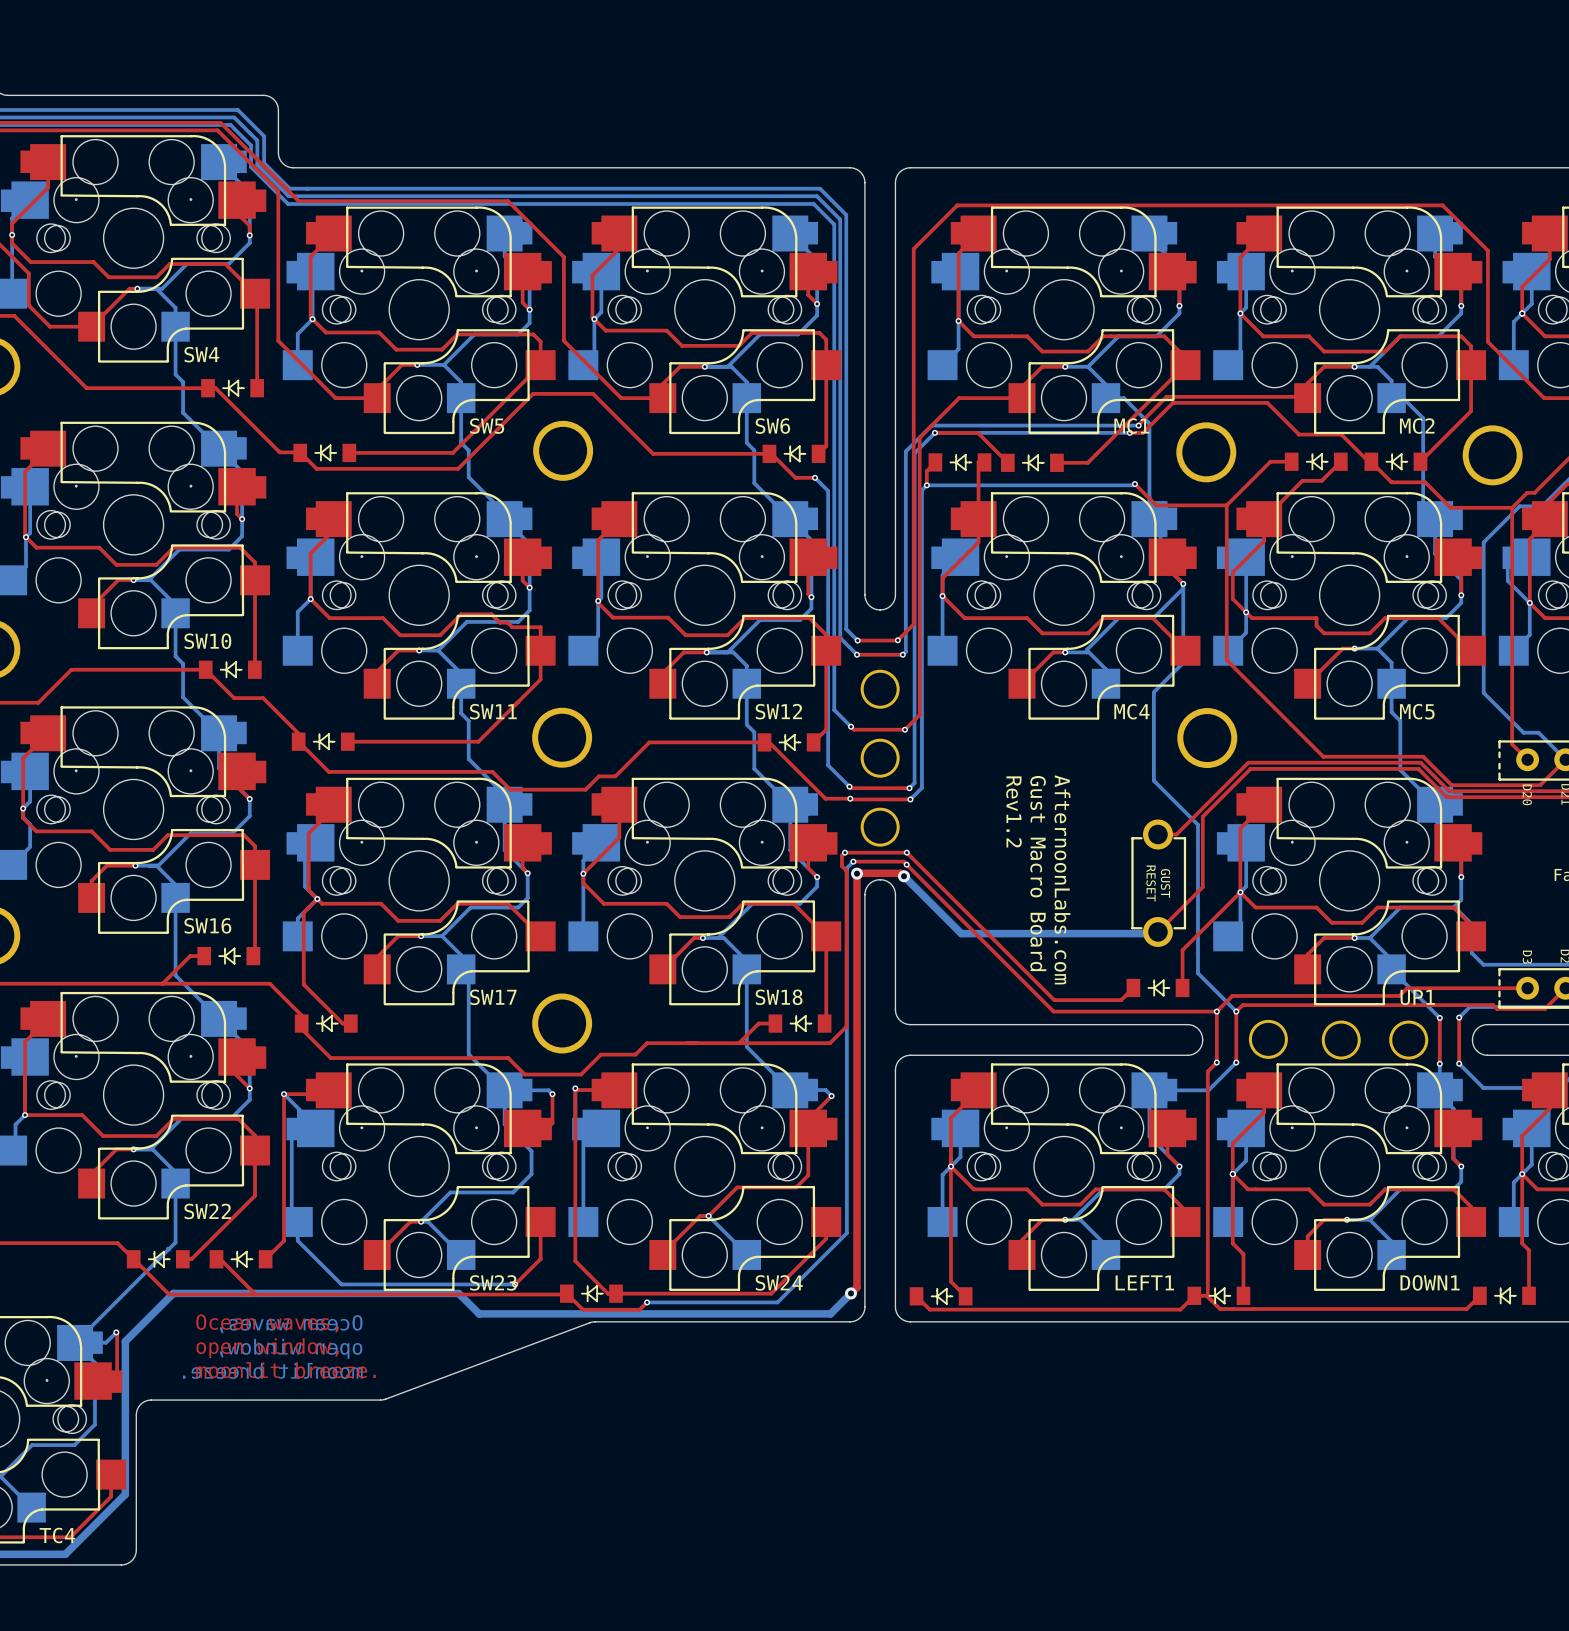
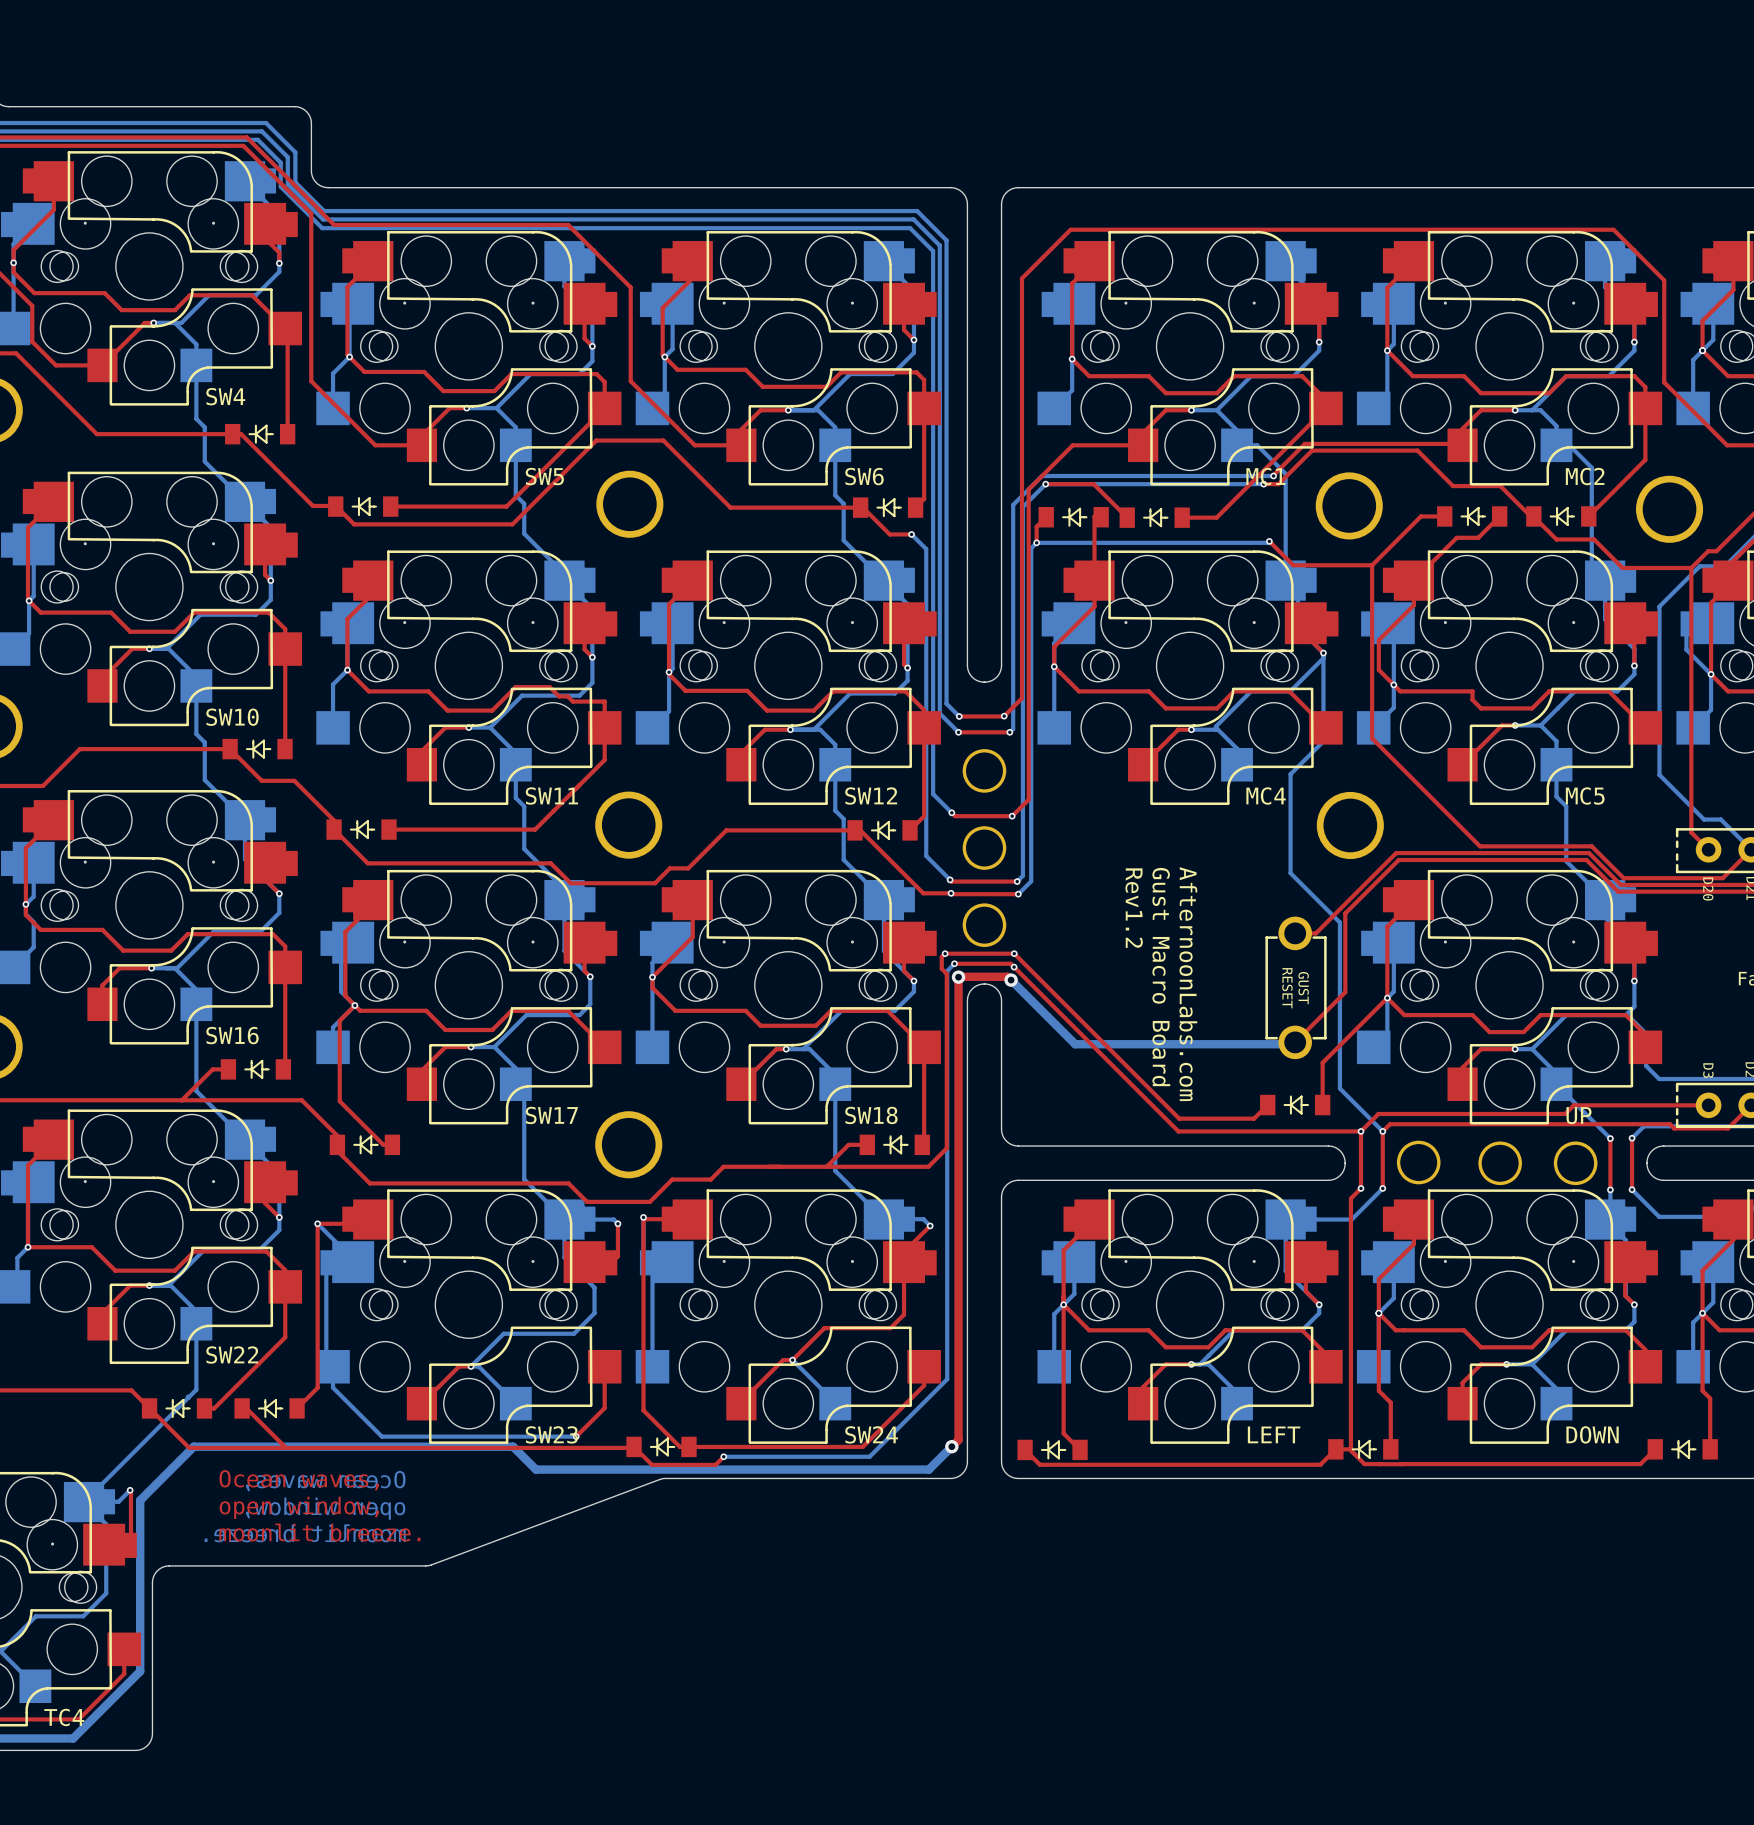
UP1 name: UP1 (1417, 997) -> UP (1579, 1115)
LEFT1 name: LEFT1 (1144, 1282) -> LEFT (1274, 1434)
DOWN1 name: DOWN1 (1430, 1282) -> DOWN (1592, 1434)

